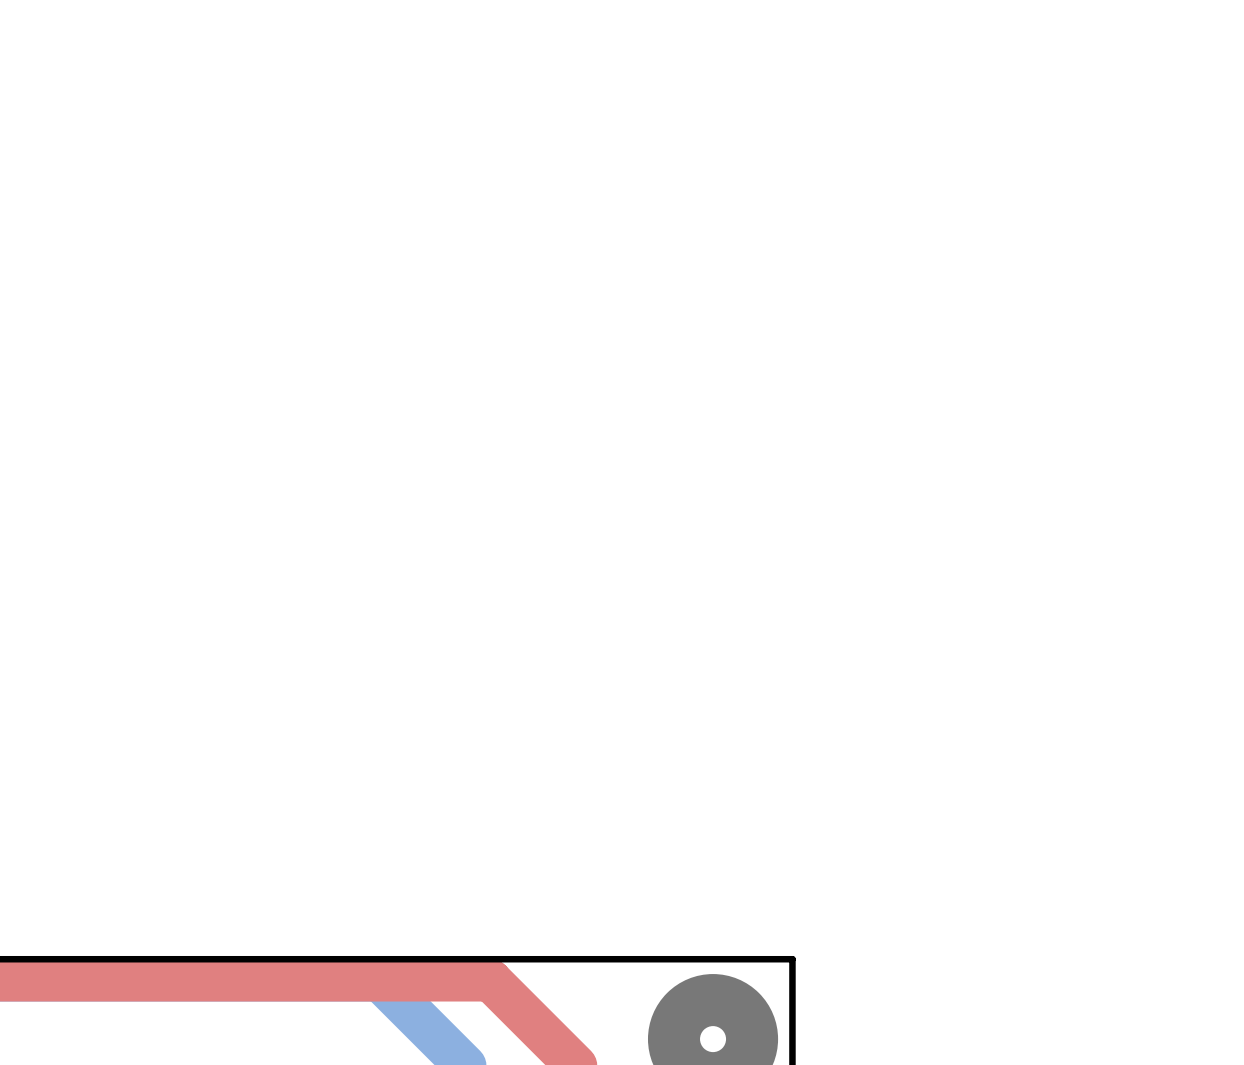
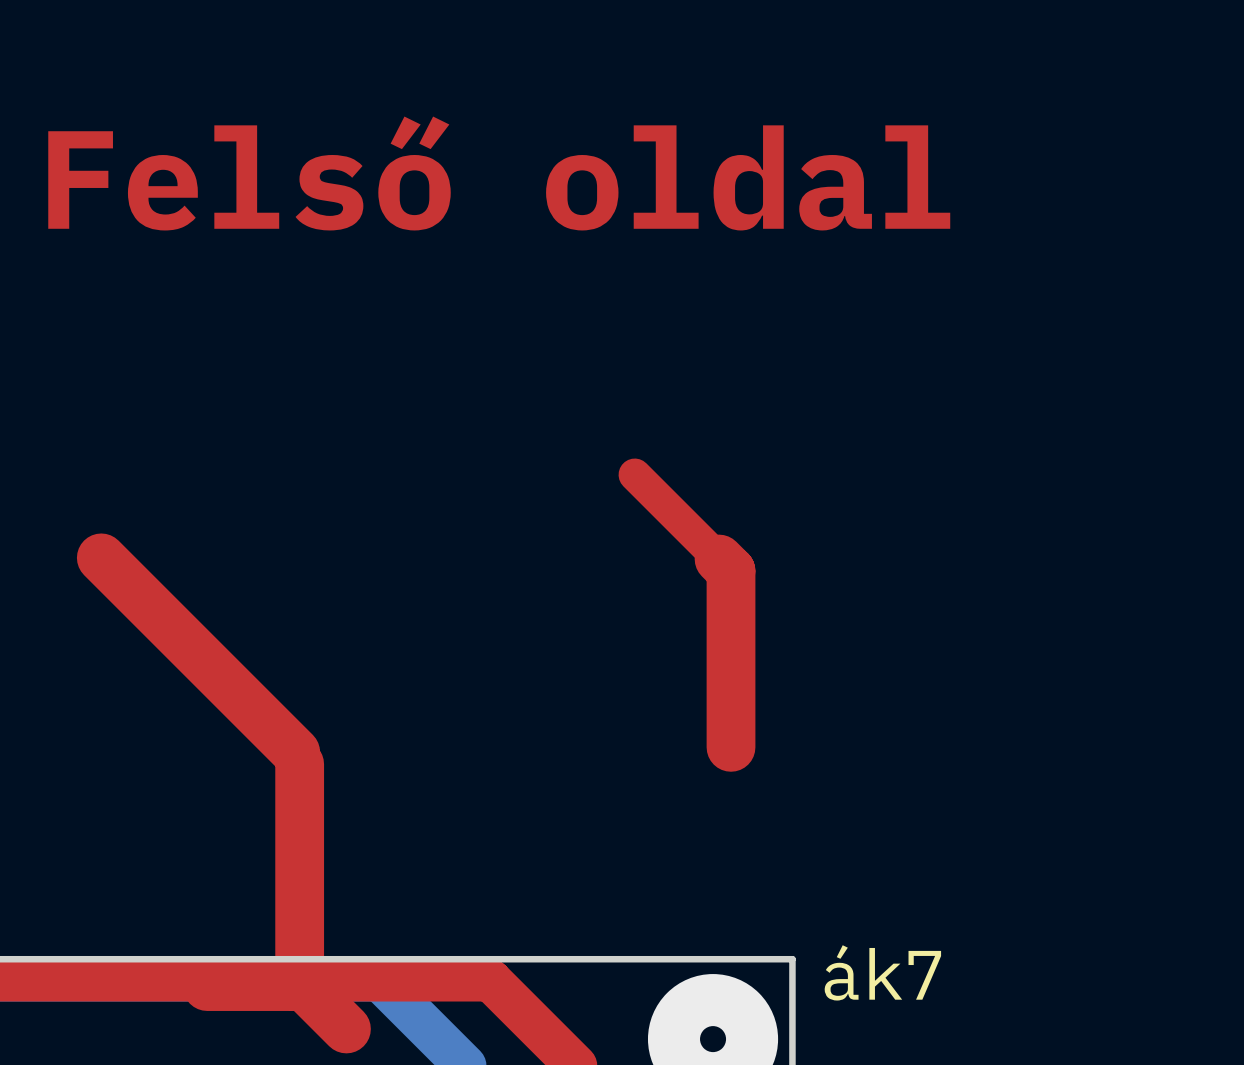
text: none -> Felső oldal (499, 173)
top track: none -> (634, 474) (731, 570) (731, 747)
top track: none -> (101, 557) (295, 752)
top track: none -> (299, 764) (299, 982) (295, 986) (207, 986)
text: none -> ák7 (882, 972)
top track: none -> (297, 980) (346, 1028)

